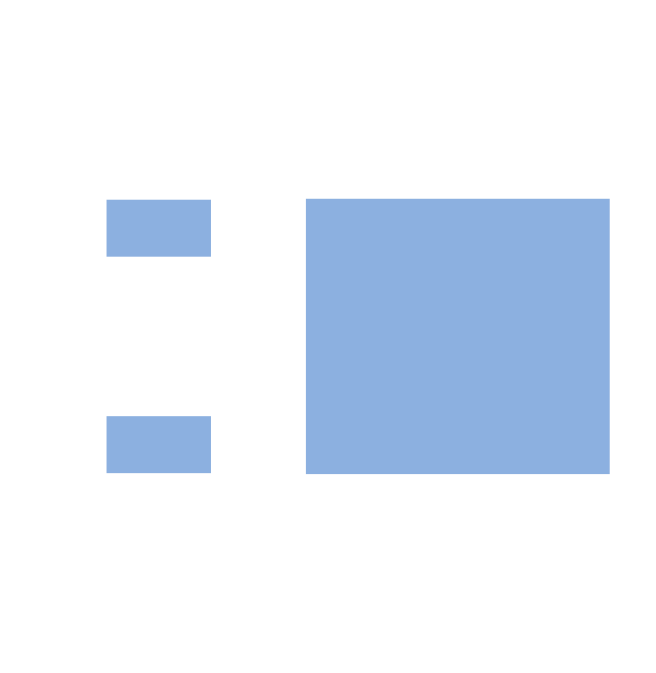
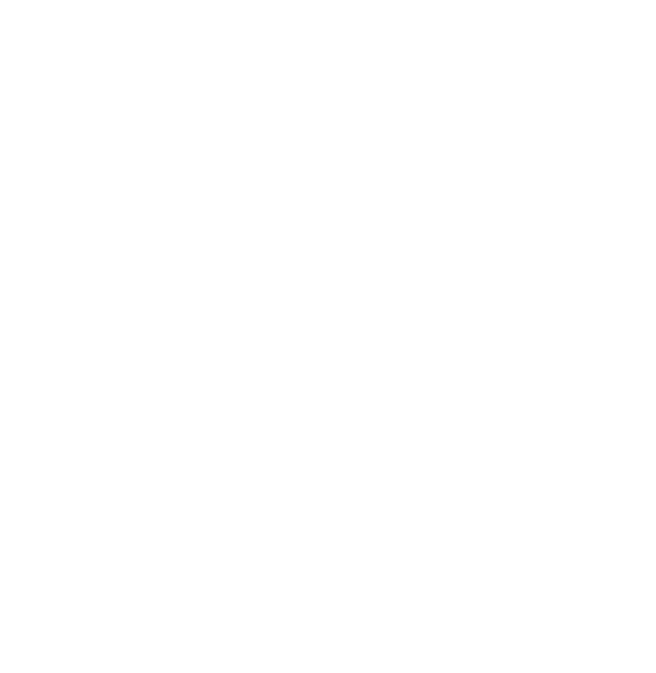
part: (358, 336) -> none

